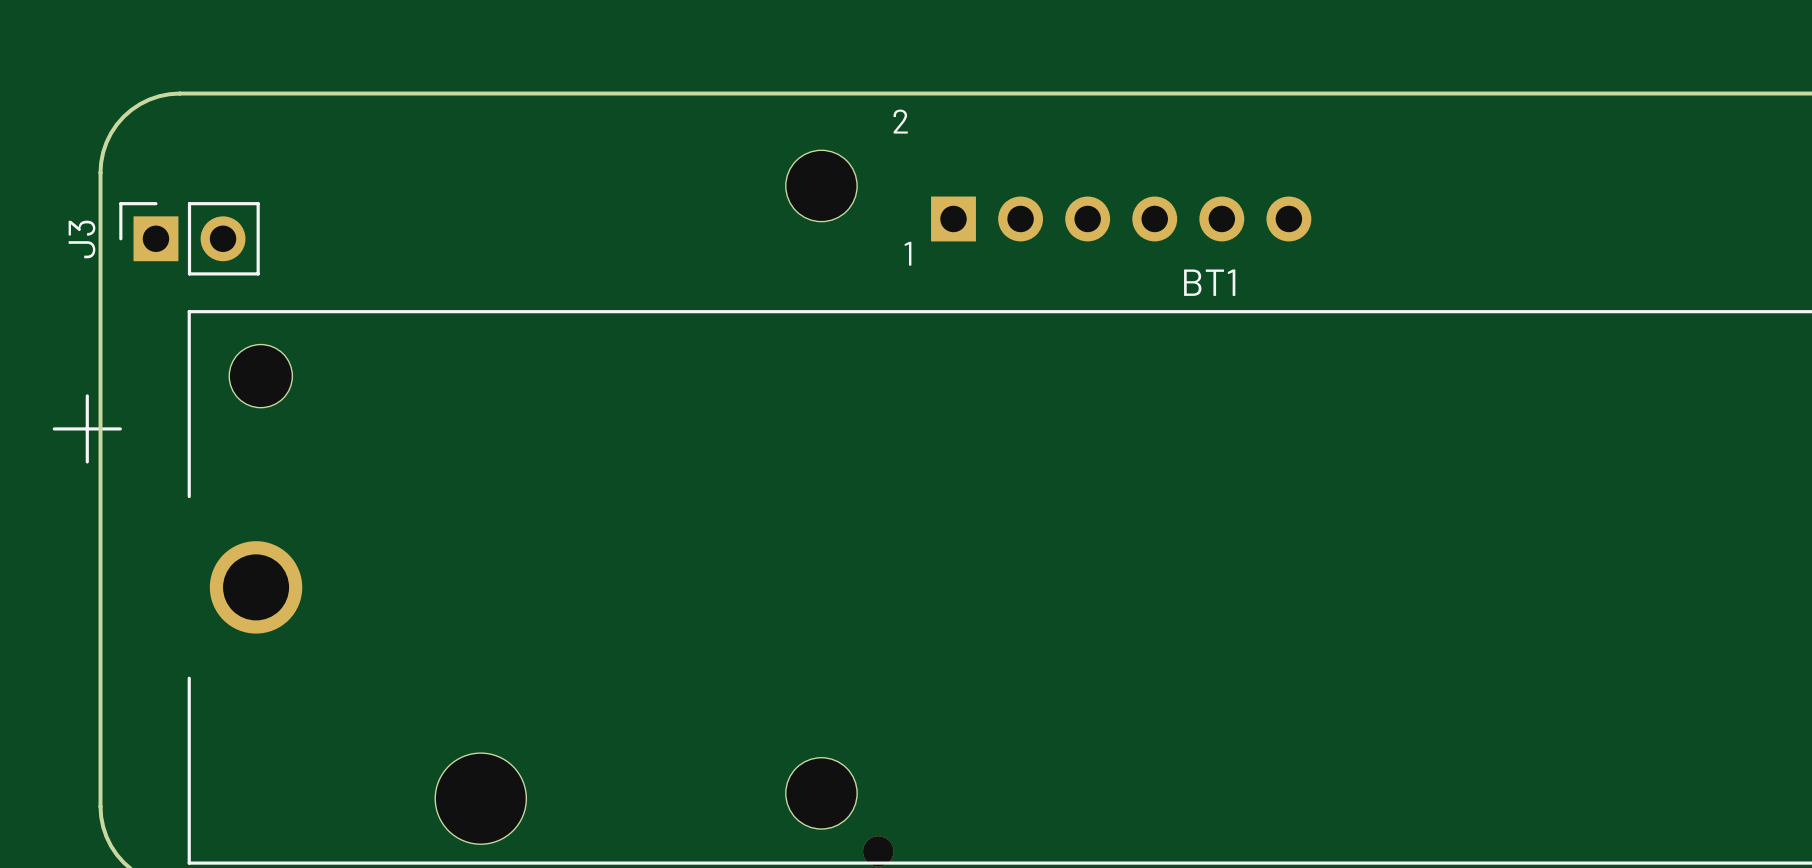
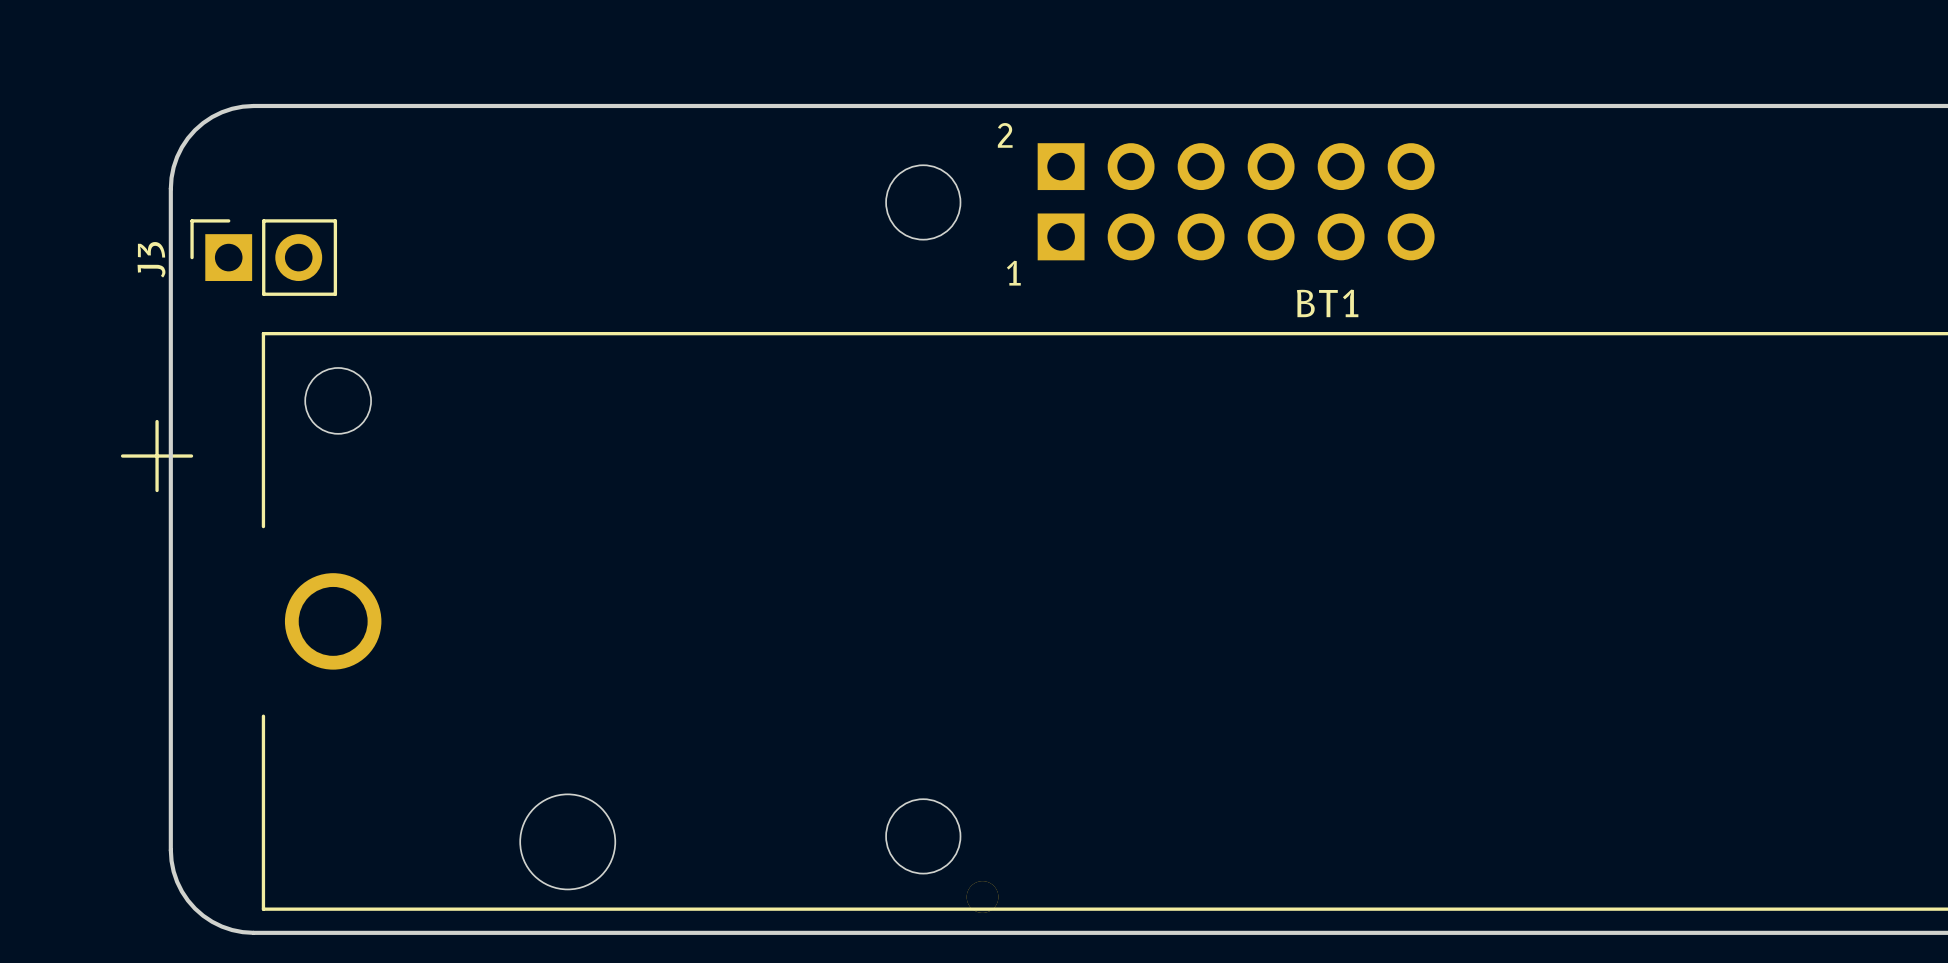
part: none -> (1236, 166)

